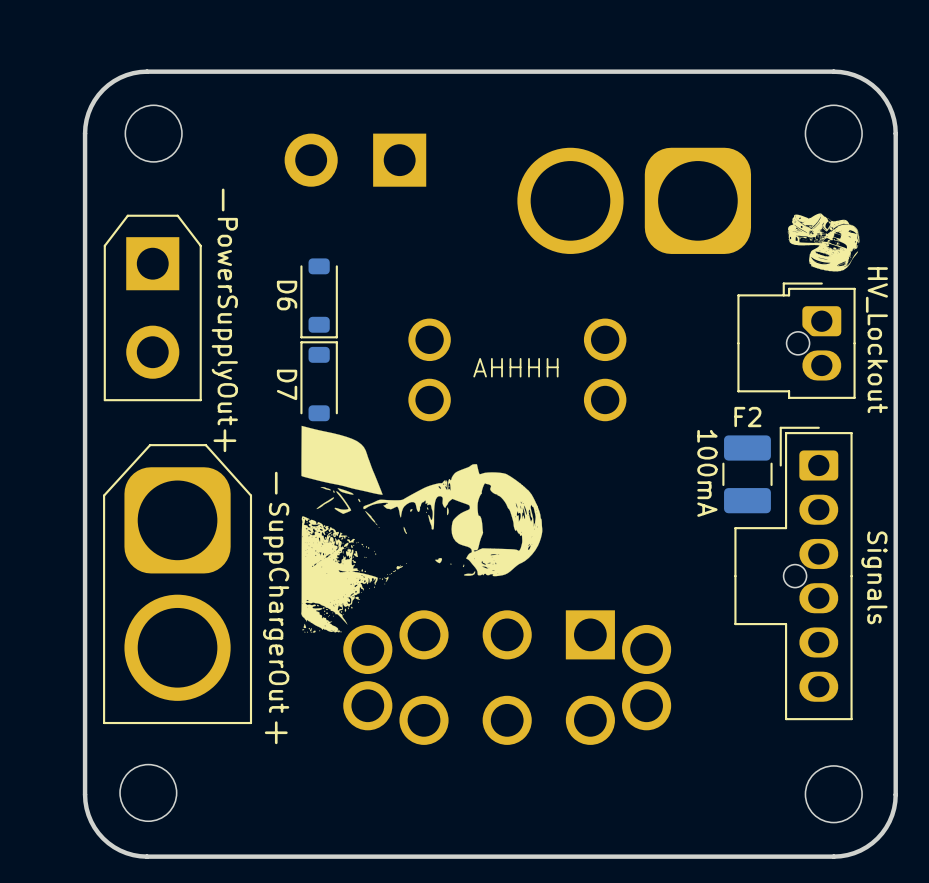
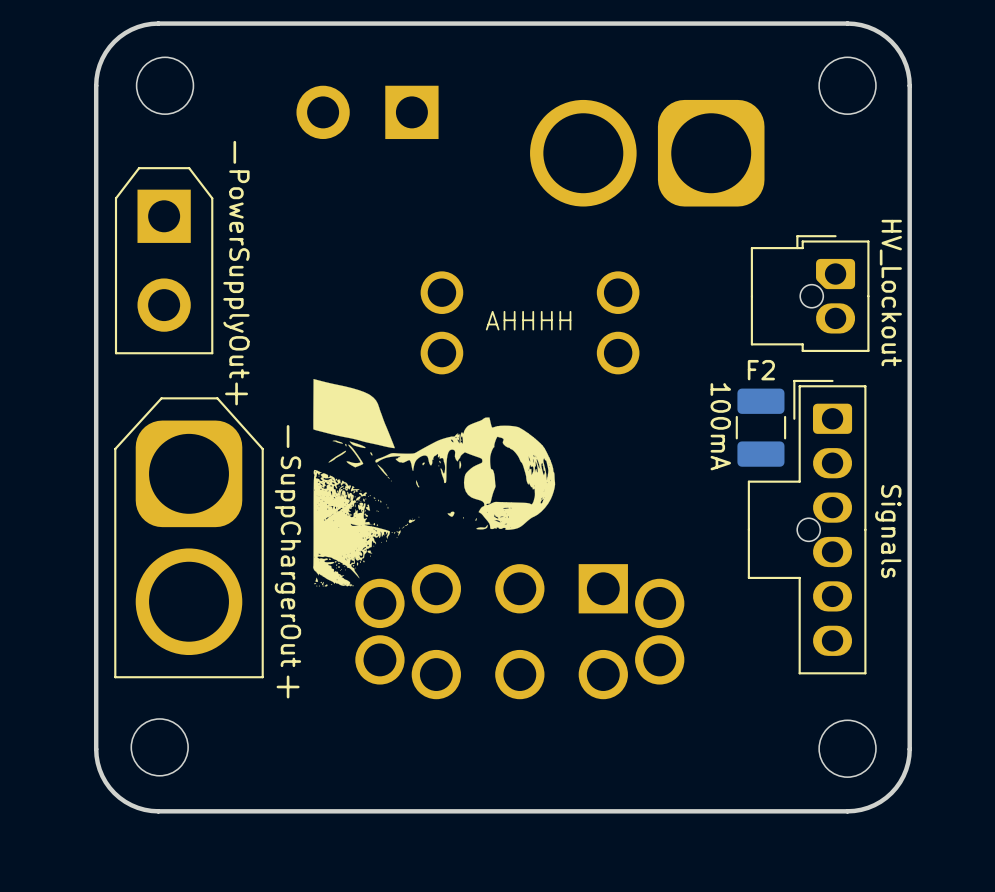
drawing: [787, 213, 860, 272] -> none
D6: (319, 298) -> none
D7: (319, 381) -> none

